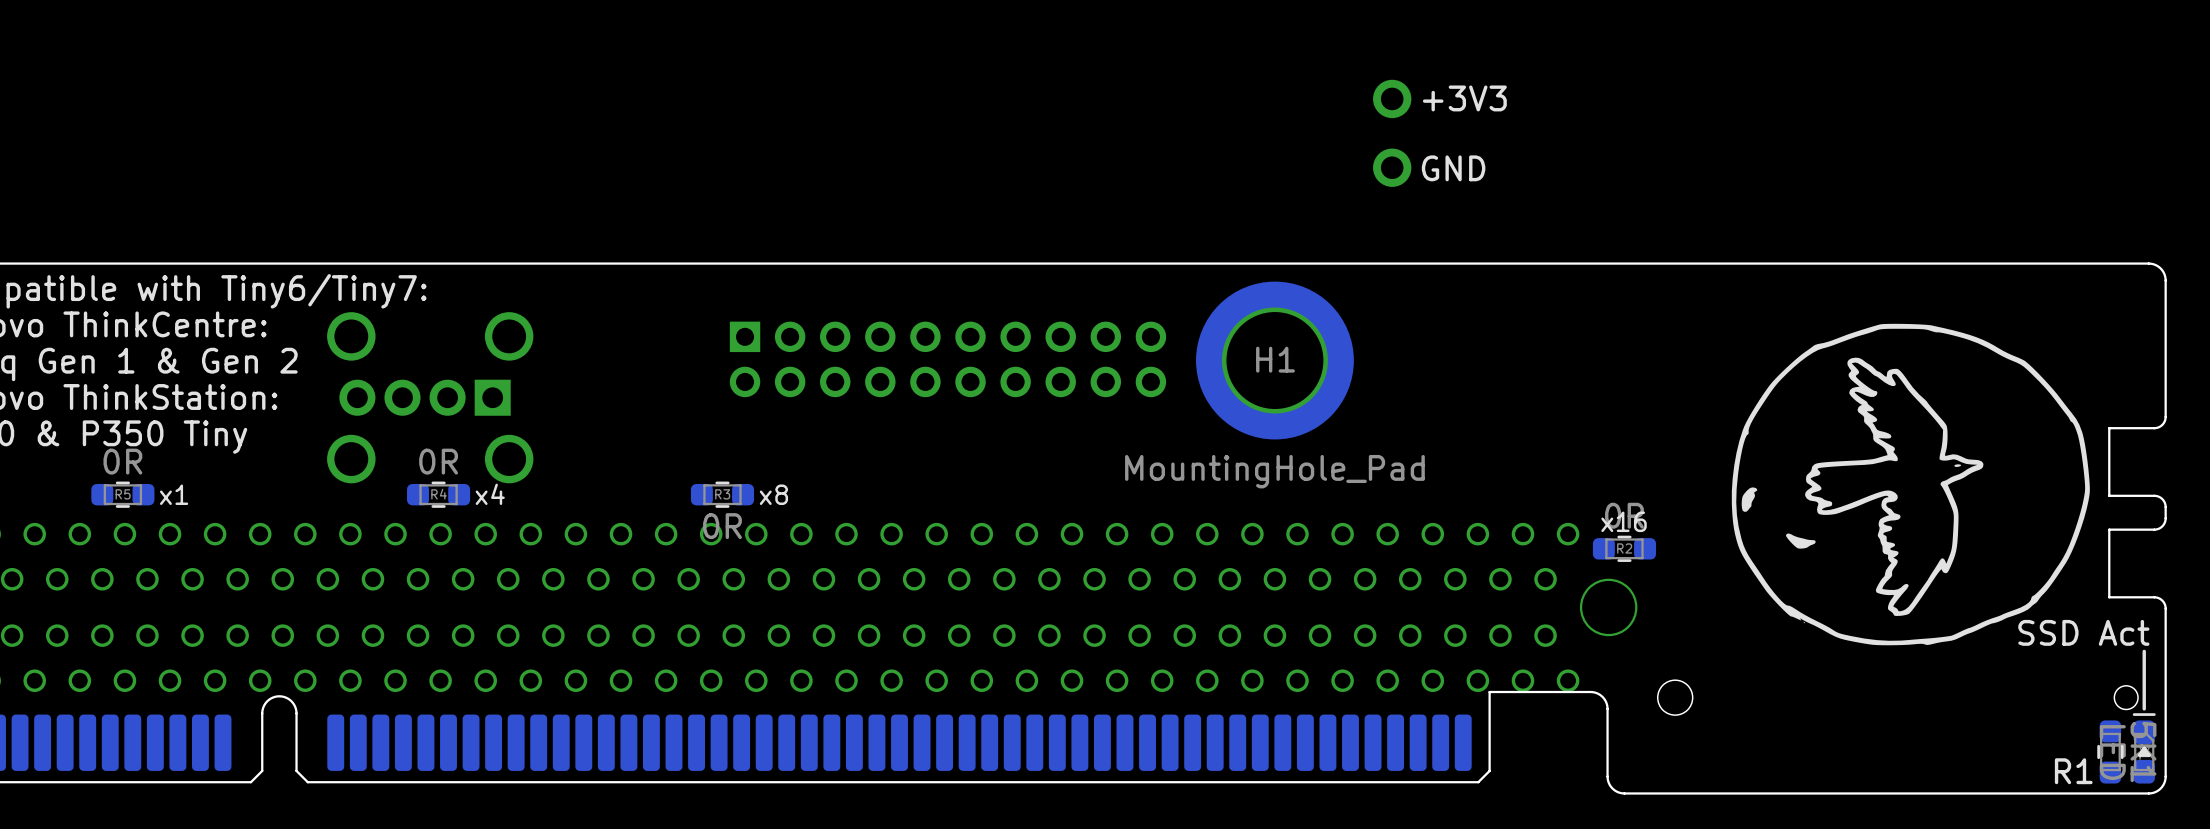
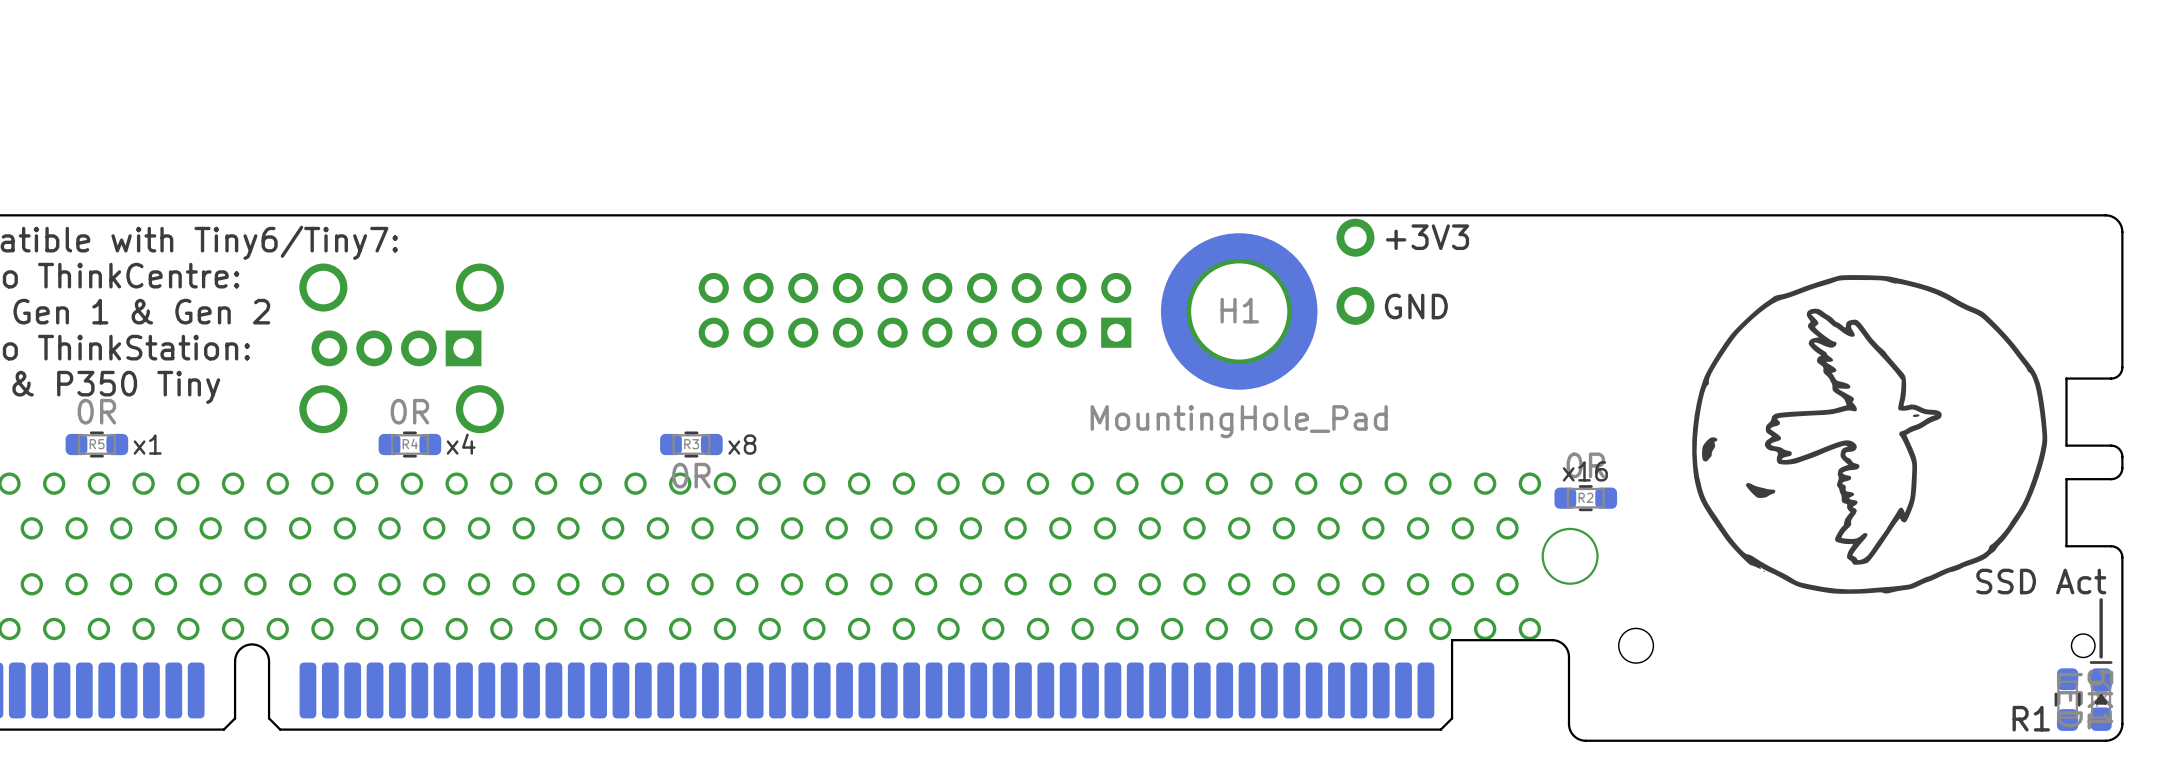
part: (1392, 98) -> none
text position: +3V3 (1464, 98) -> +3V3 (1427, 237)
part: (1392, 167) -> none
text position: GND (1453, 168) -> GND (1416, 306)
part: none -> (1355, 237)
part: none -> (1355, 305)
part rotation: 0° (947, 359) -> 180° (915, 310)

